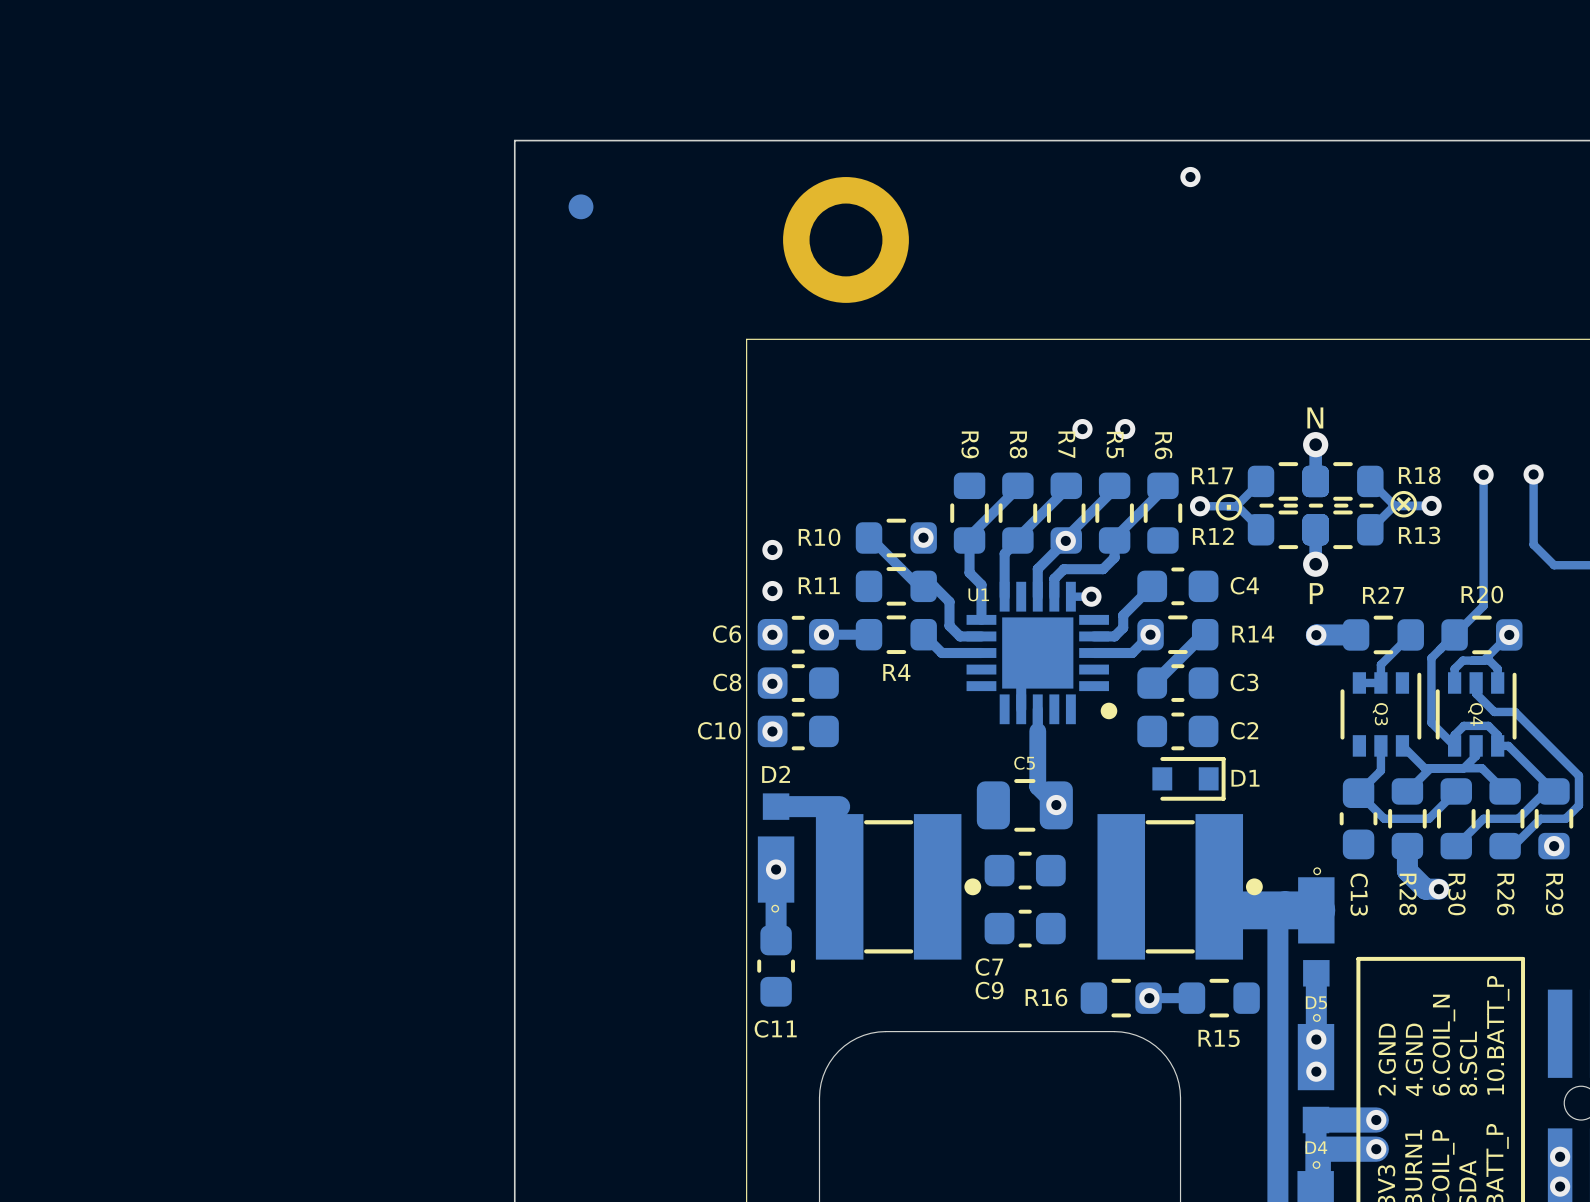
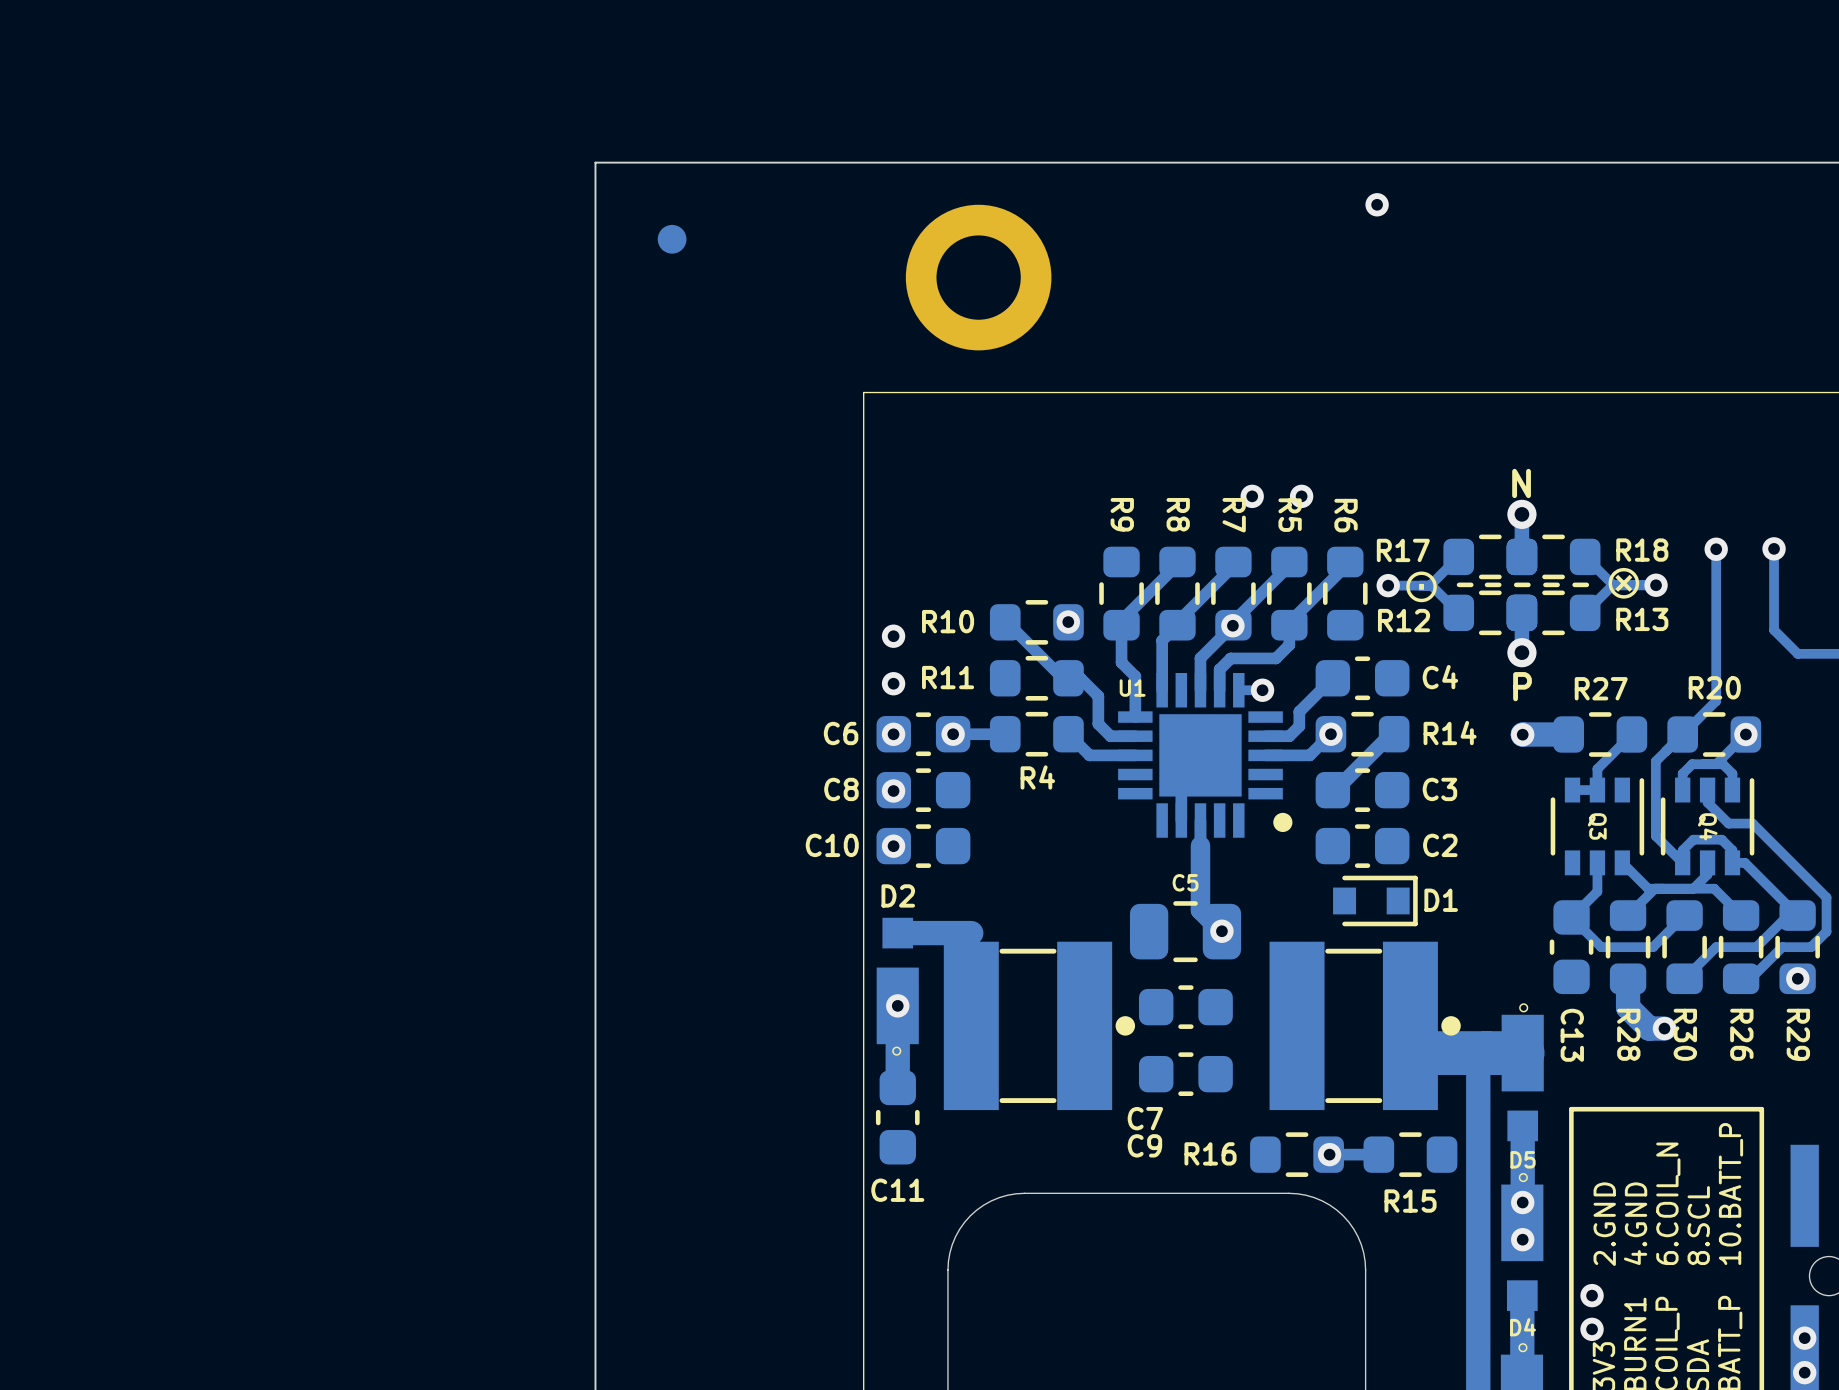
track: (1376, 1120) (1316, 1120) -> none
track: (1376, 1149) (1320, 1149) (1318, 1151) (1318, 1170) -> none

